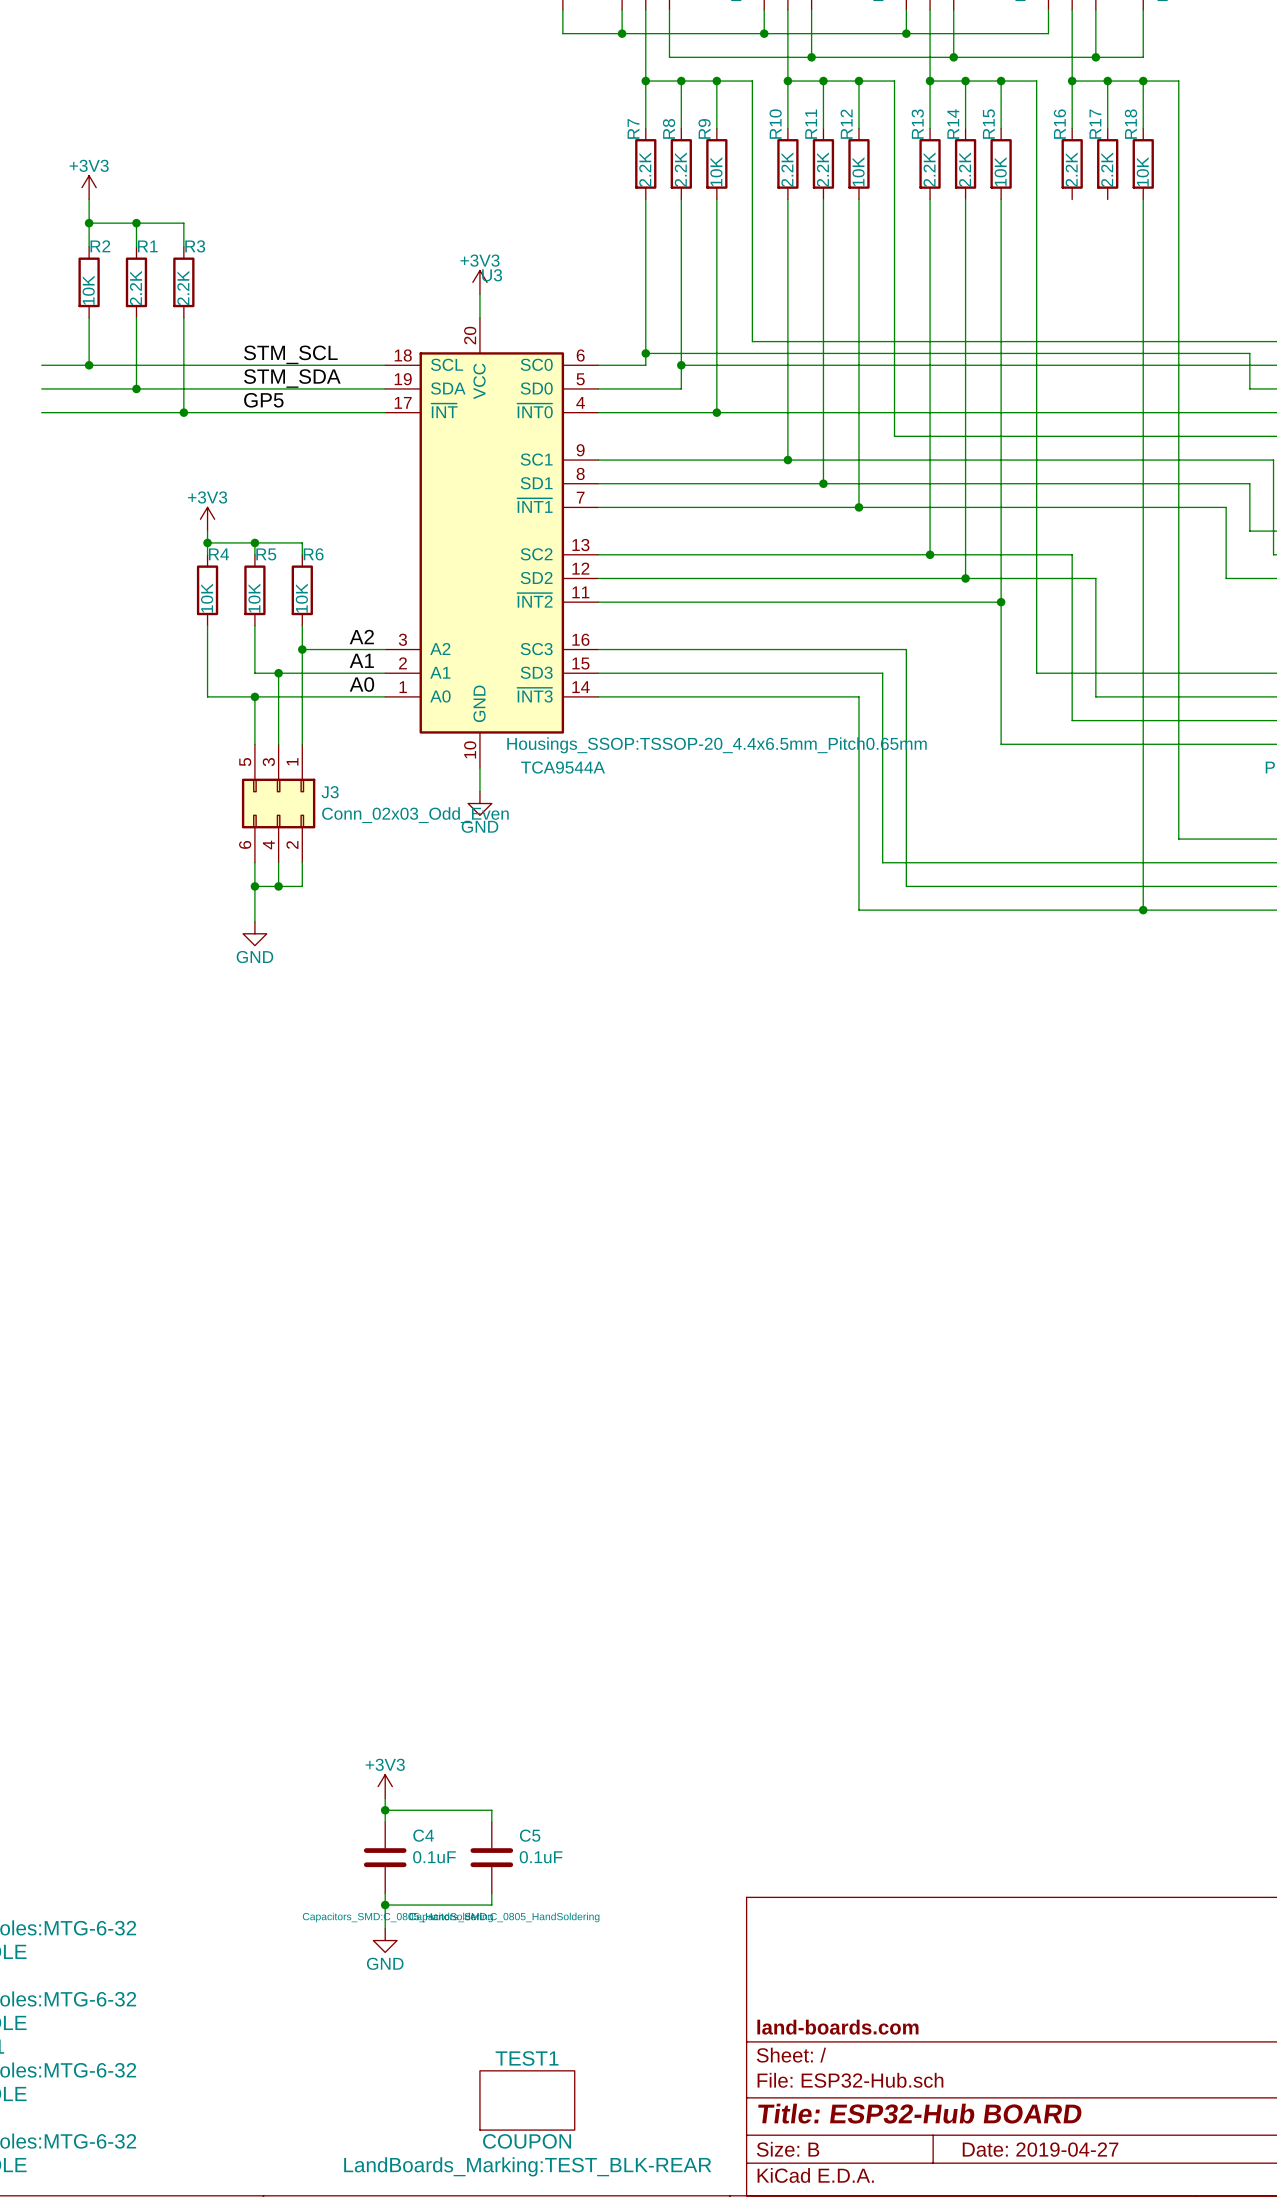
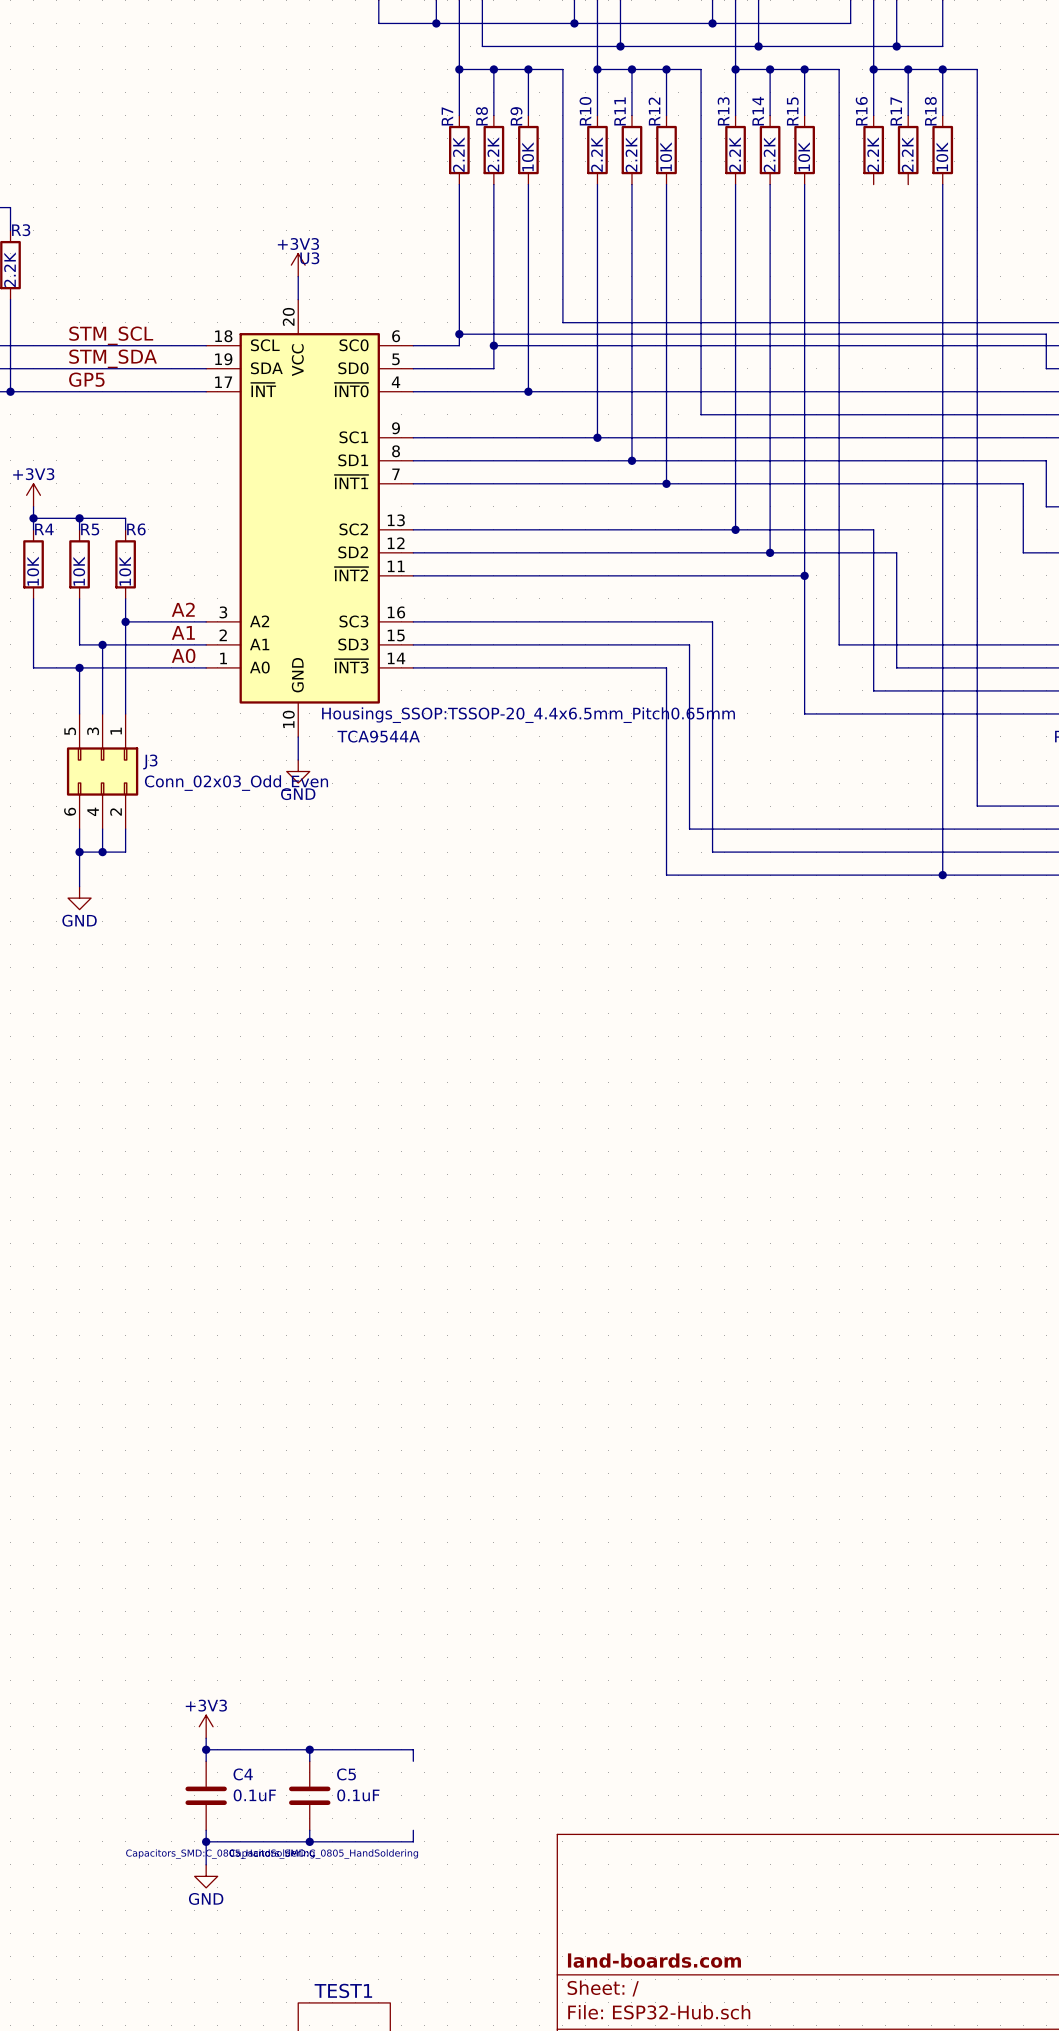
wire: none -> (309, 1749) (413, 1749) (413, 1761)
junction: none -> (309, 1749)
wire: none -> (413, 1830) (413, 1841) (309, 1841)
junction: none -> (309, 1841)

